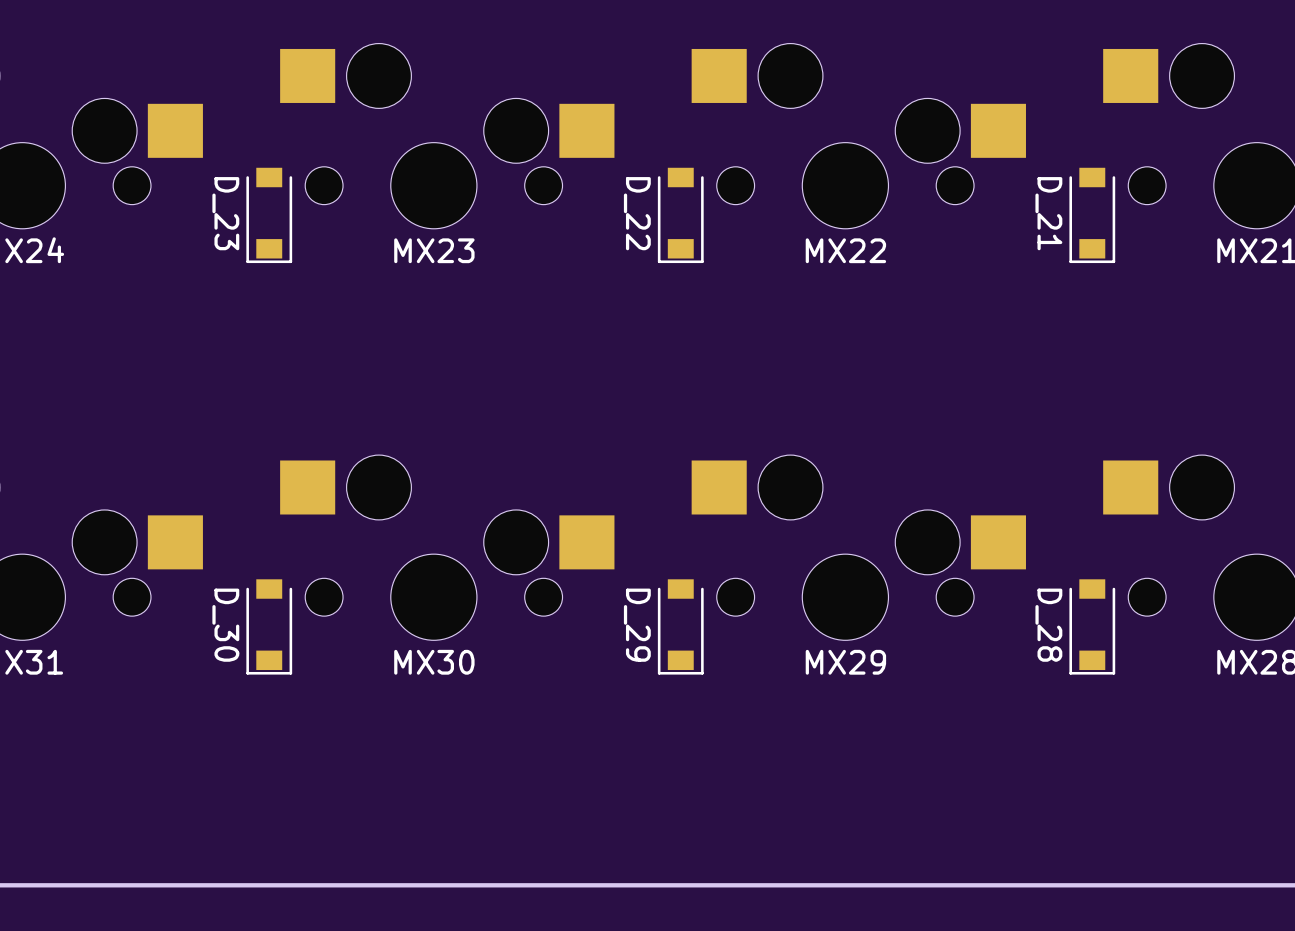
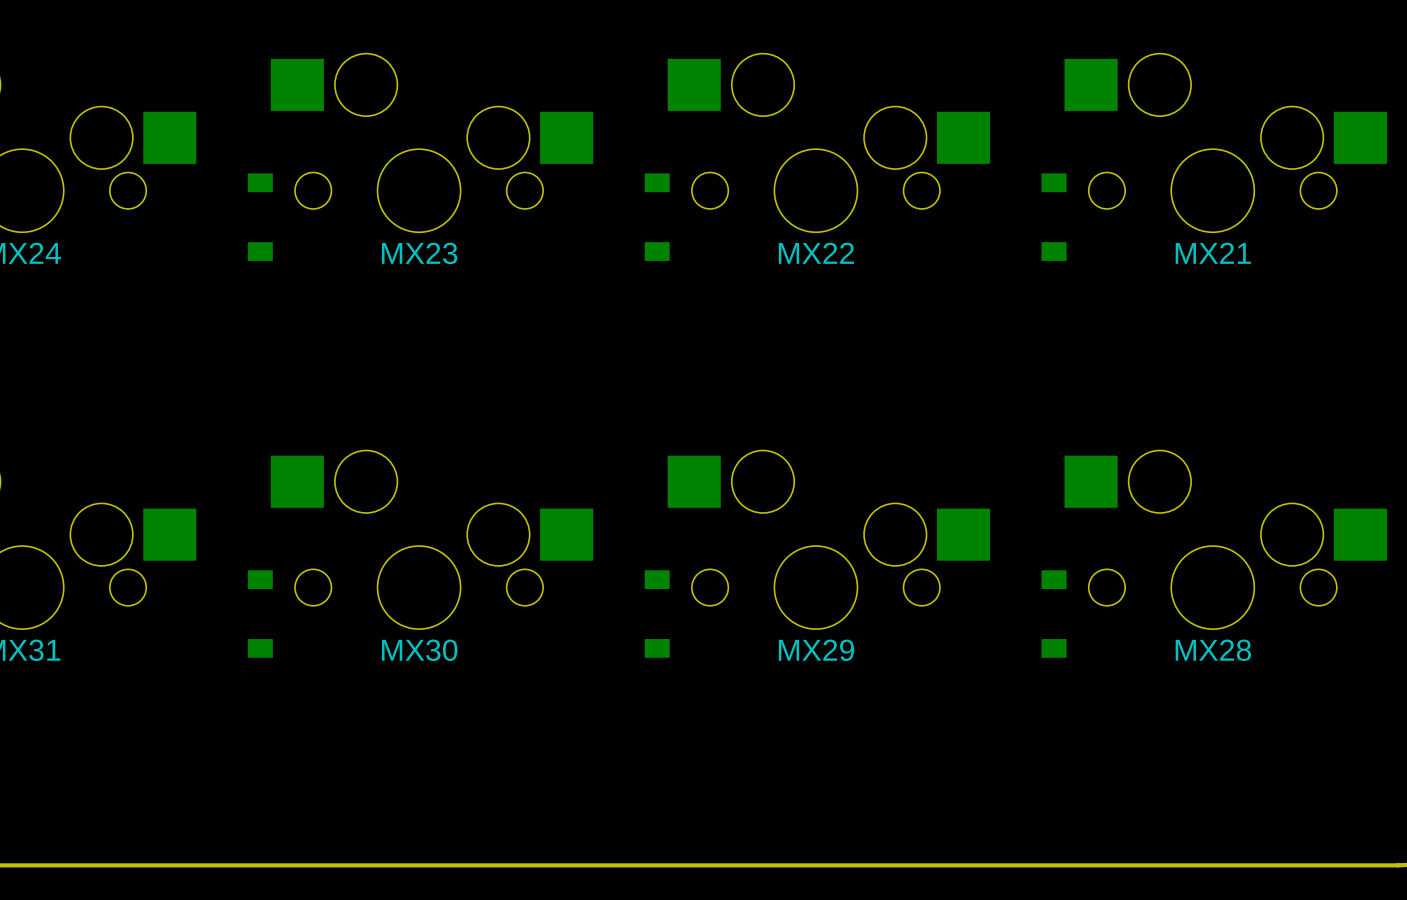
part: none -> (260, 217)
part: none -> (657, 217)
part: none -> (1054, 217)
D_23: (269, 215) -> none
D_22: (680, 215) -> none
D_21: (1092, 215) -> none
part: none -> (260, 614)
part: none -> (657, 614)
part: none -> (1054, 614)
D_30: (269, 626) -> none
D_29: (680, 626) -> none
D_28: (1092, 626) -> none

